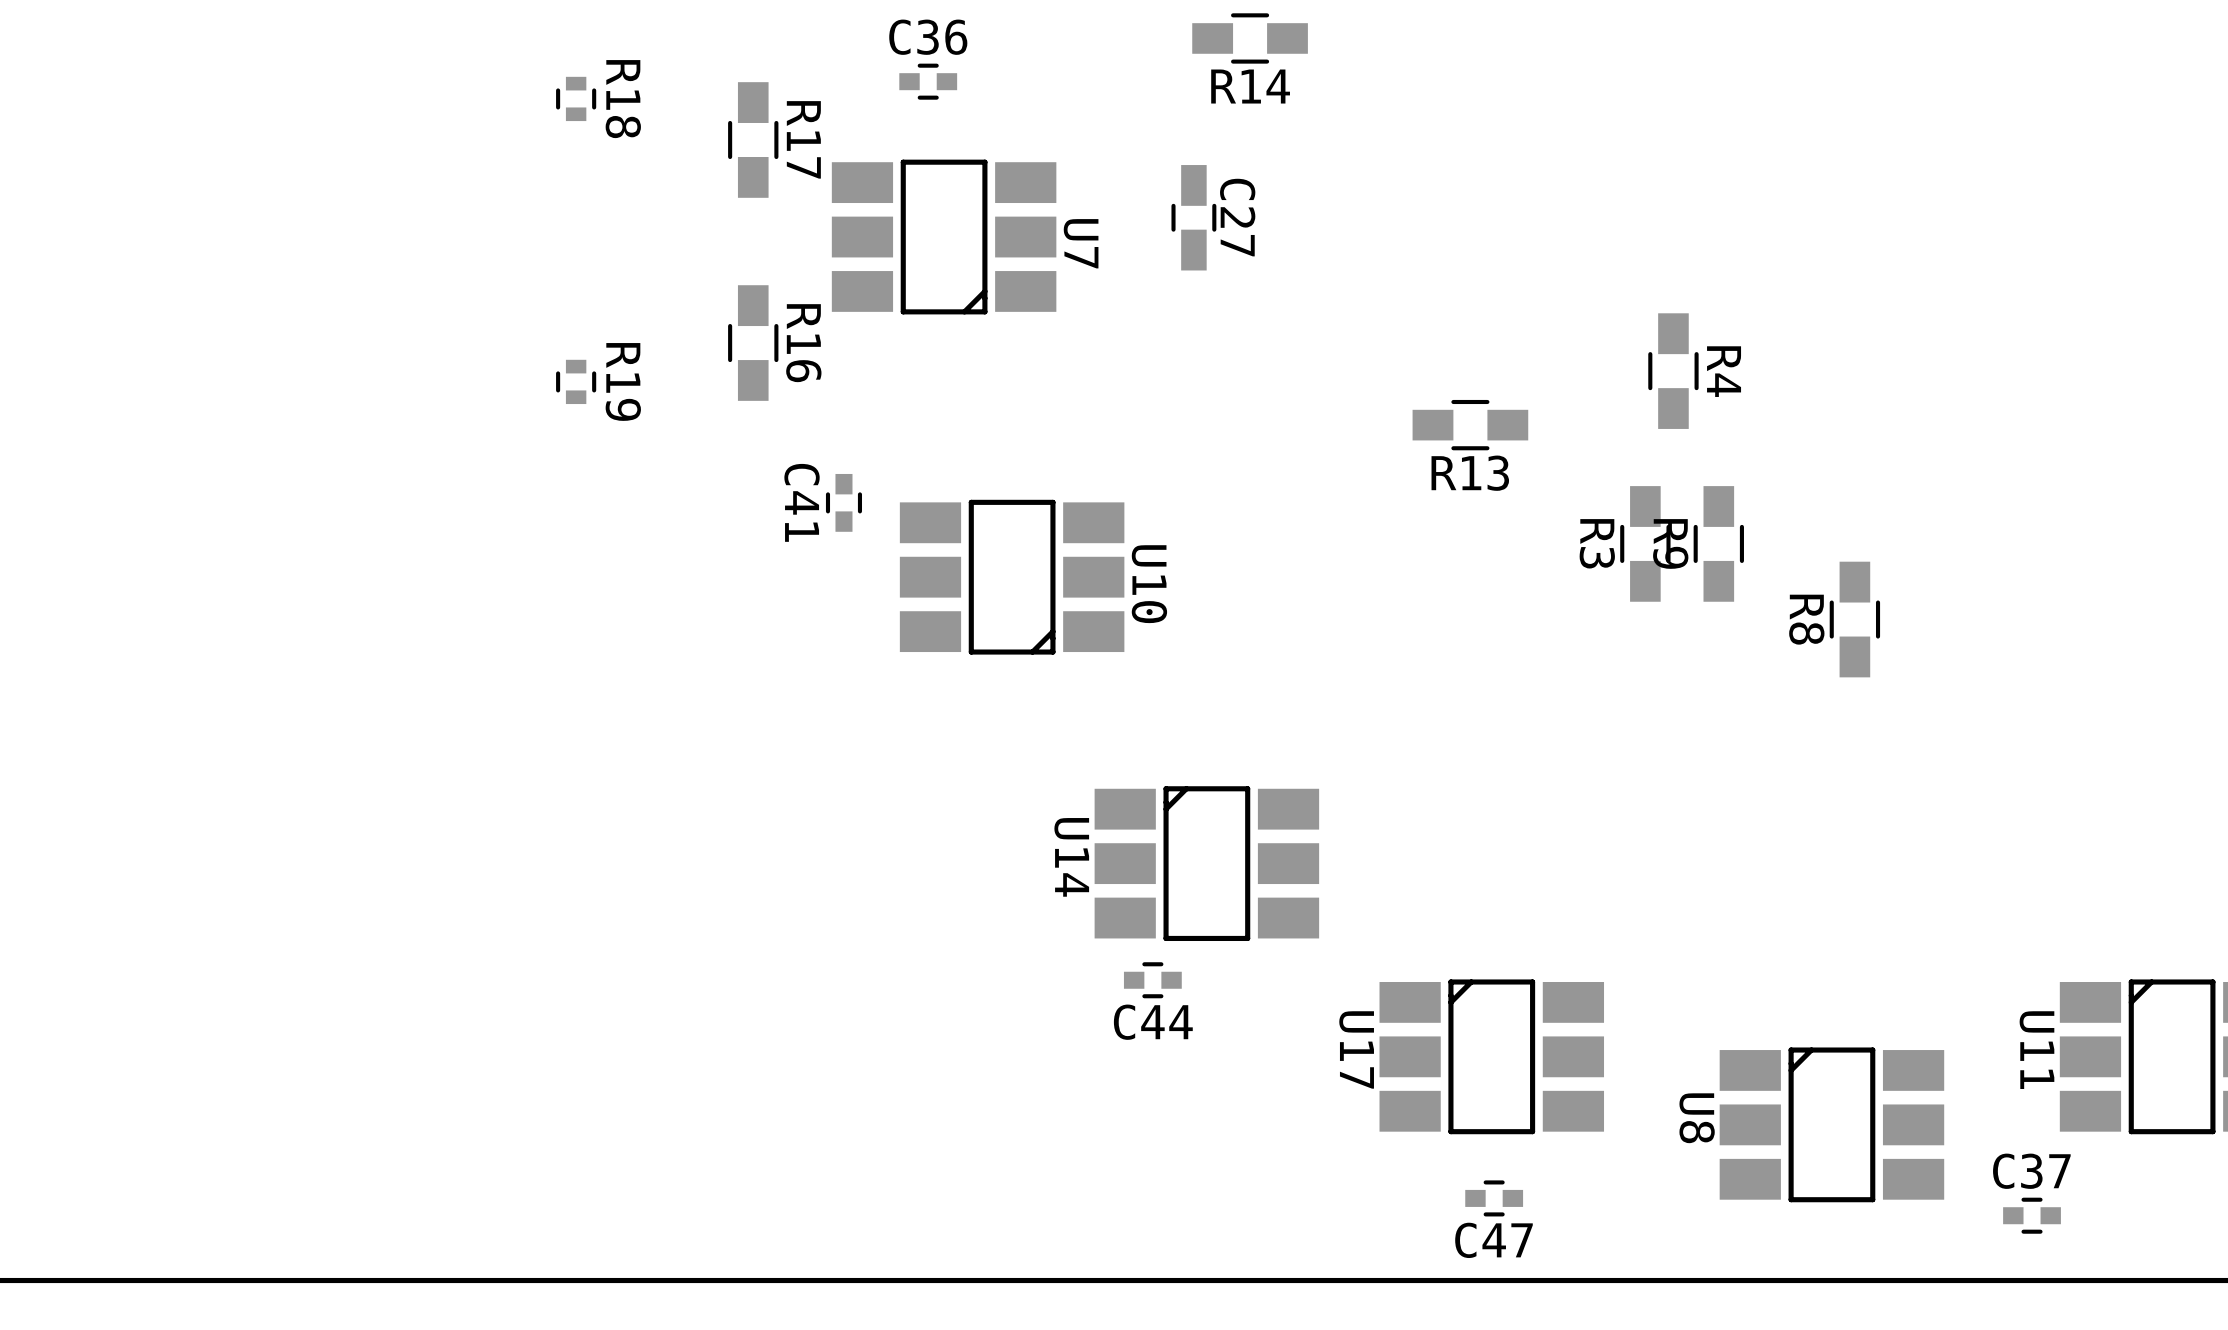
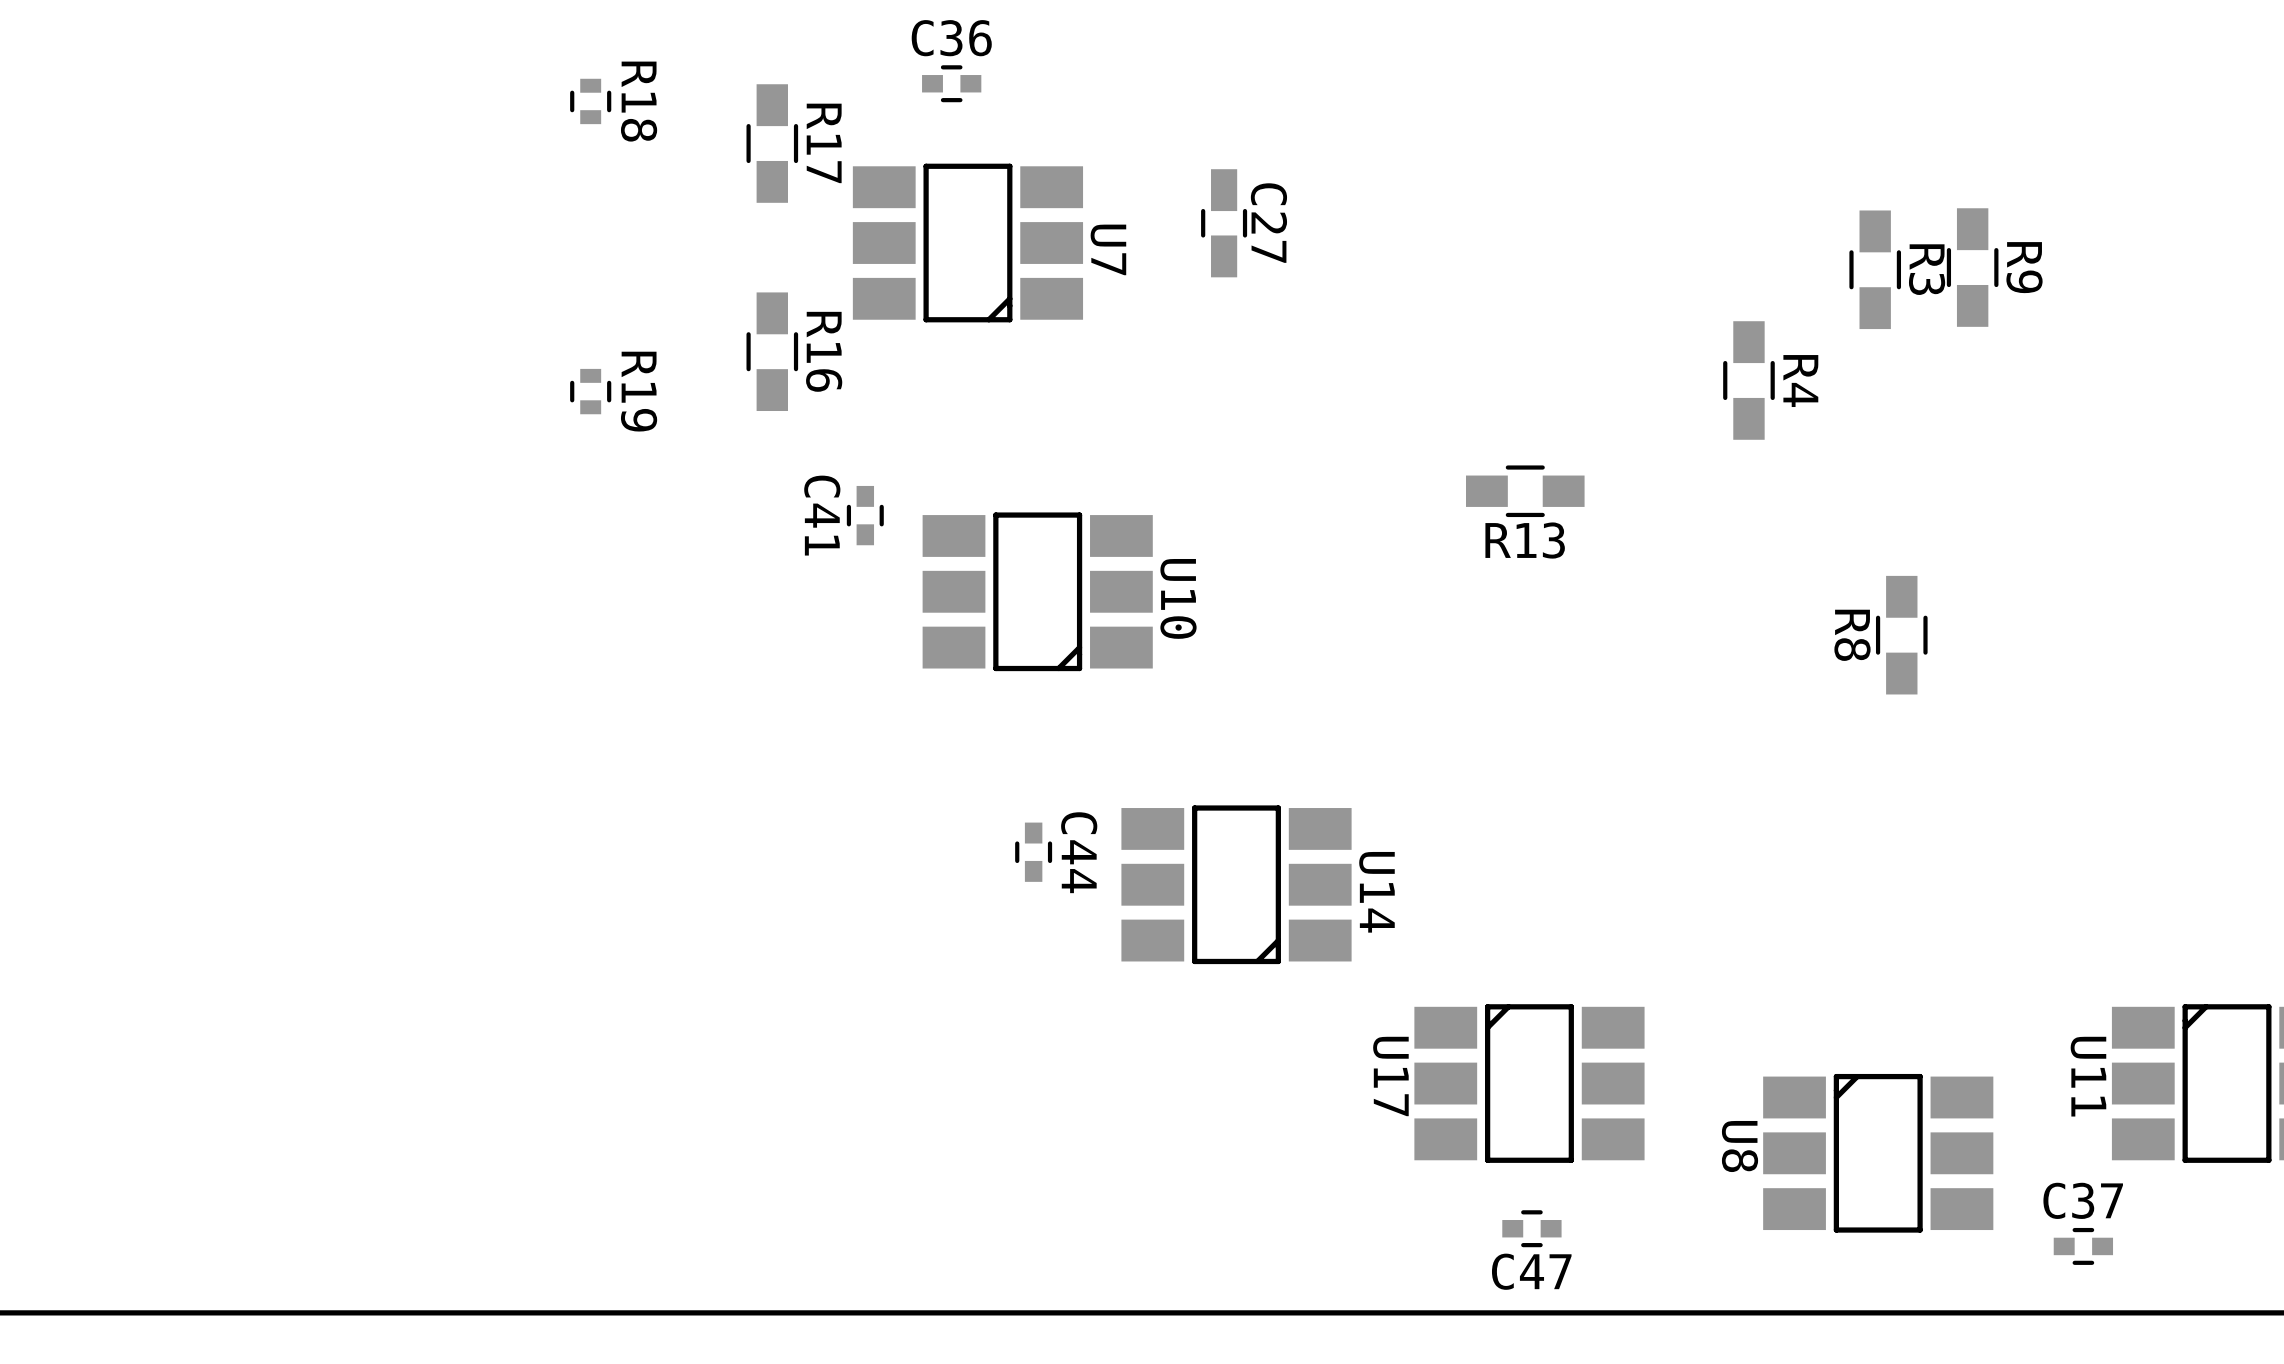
R14: (1250, 38) -> none
R4 position: (1673, 371) -> (1748, 380)
R13 position: (1470, 425) -> (1525, 491)
R3 name position: R3 (1597, 543) -> R3 (1927, 269)
R3 position: (1645, 543) -> (1875, 269)
R9 name position: R9 (1670, 543) -> R9 (2024, 267)
R9 position: (1718, 543) -> (1972, 267)
U14 rotation: 0° (1206, 863) -> 180° (1236, 884)
C44 rotation: 0° (1152, 980) -> 90° clockwise (1033, 852)
C44 position: (1152, 980) -> (1033, 852)

